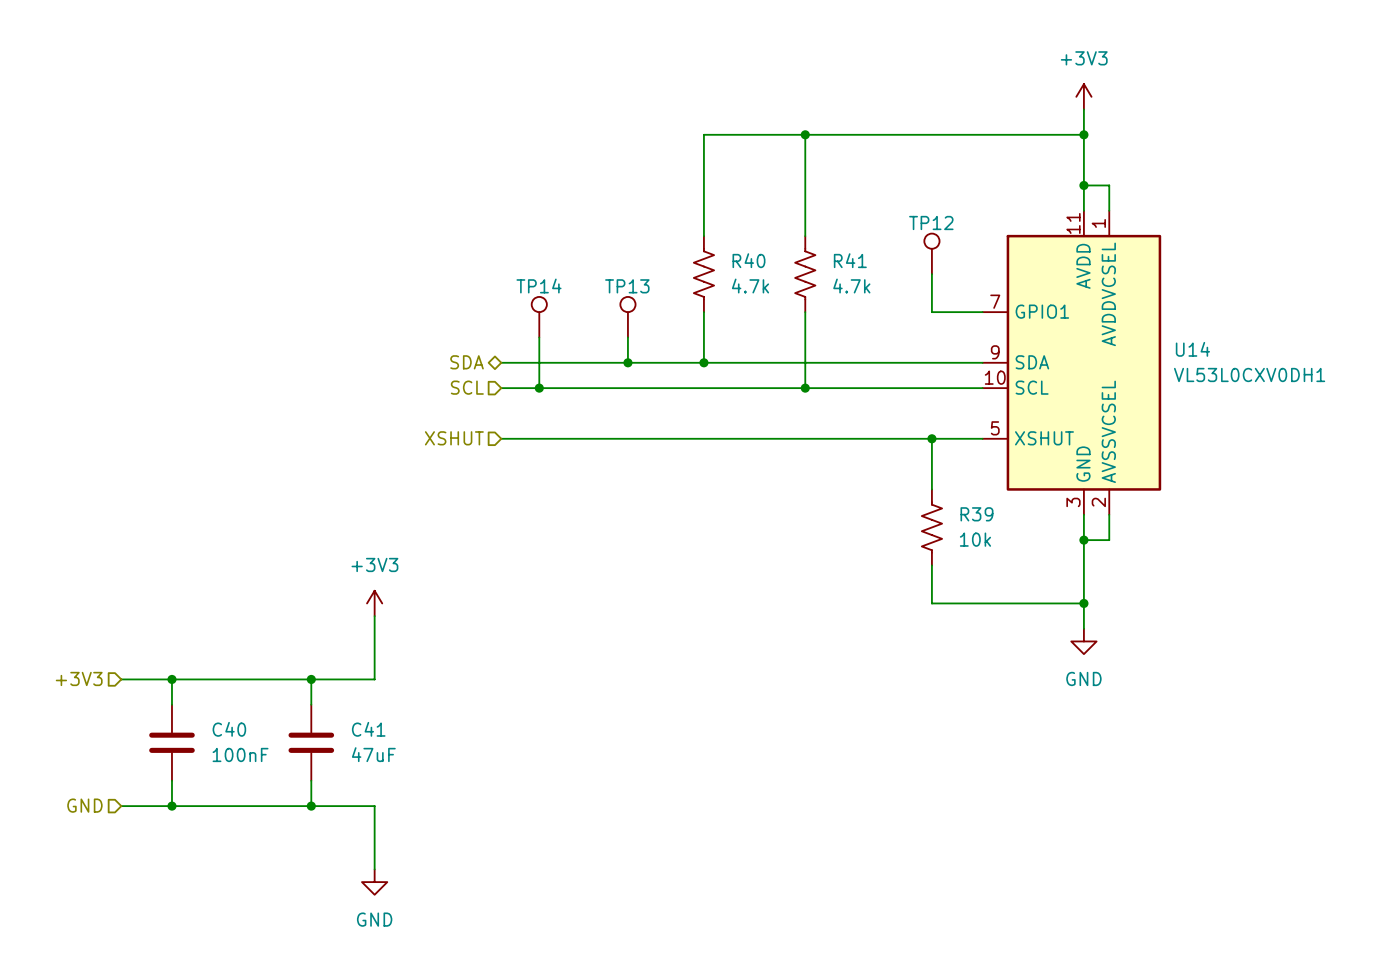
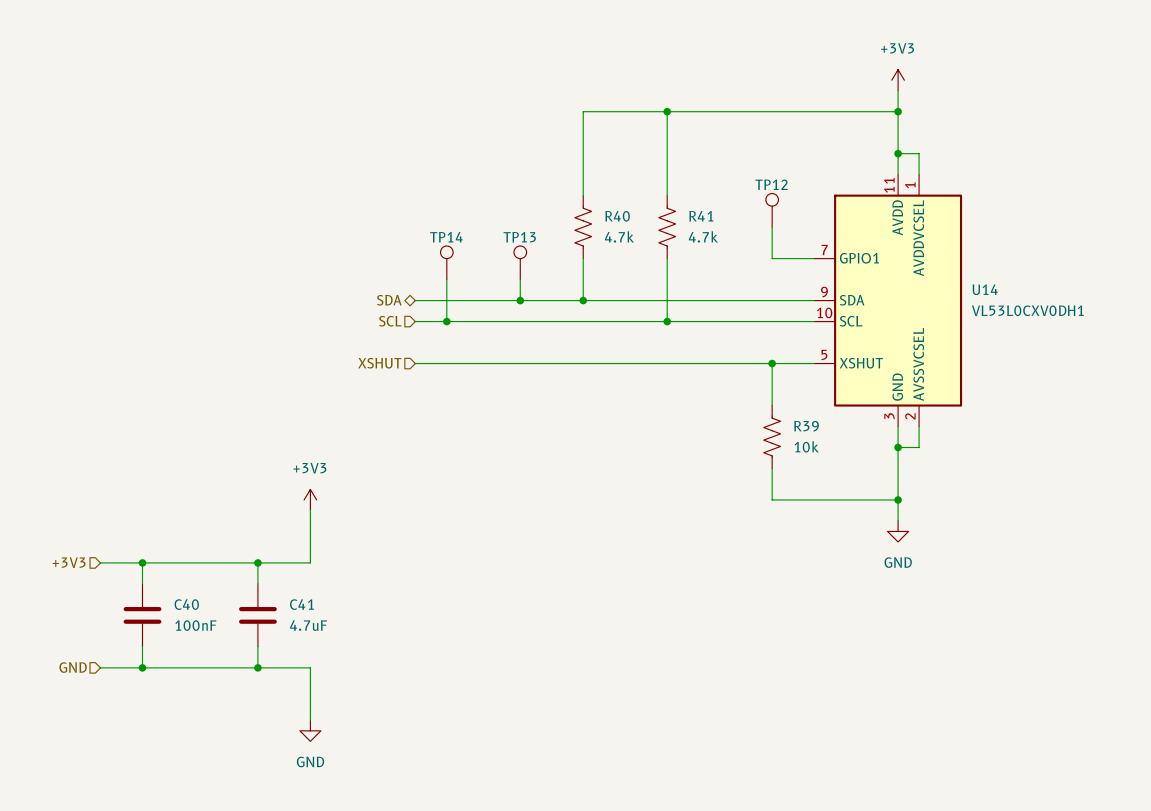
C41 value: 47uF (373, 754) -> 4.7uF (308, 625)

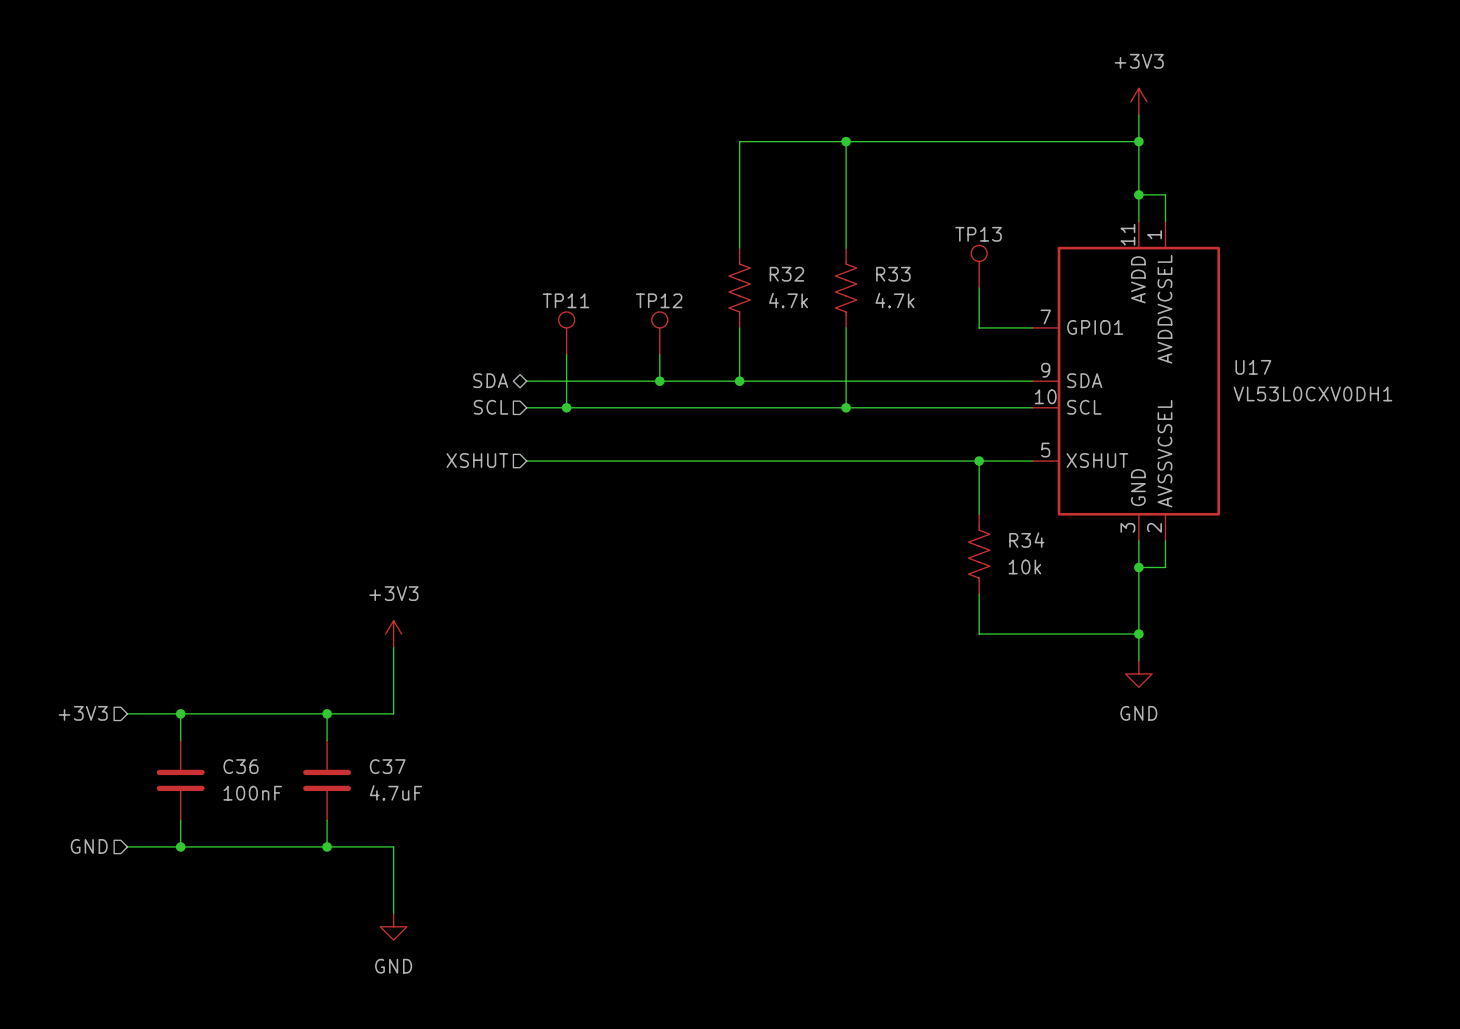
TP12 name: TP12 (771, 184) -> TP13 (978, 234)
R40 name: R40 (617, 216) -> R32 (786, 274)
R41 name: R41 (701, 216) -> R33 (893, 274)
TP14 name: TP14 (446, 237) -> TP11 (565, 300)
TP13 name: TP13 (519, 237) -> TP12 (659, 300)
U14 name: U14 (985, 289) -> U17 (1253, 367)
R39 name: R39 (806, 426) -> R34 (1026, 540)
C40 name: C40 (186, 604) -> C36 (241, 766)
C41 name: C41 (301, 604) -> C37 (387, 766)

